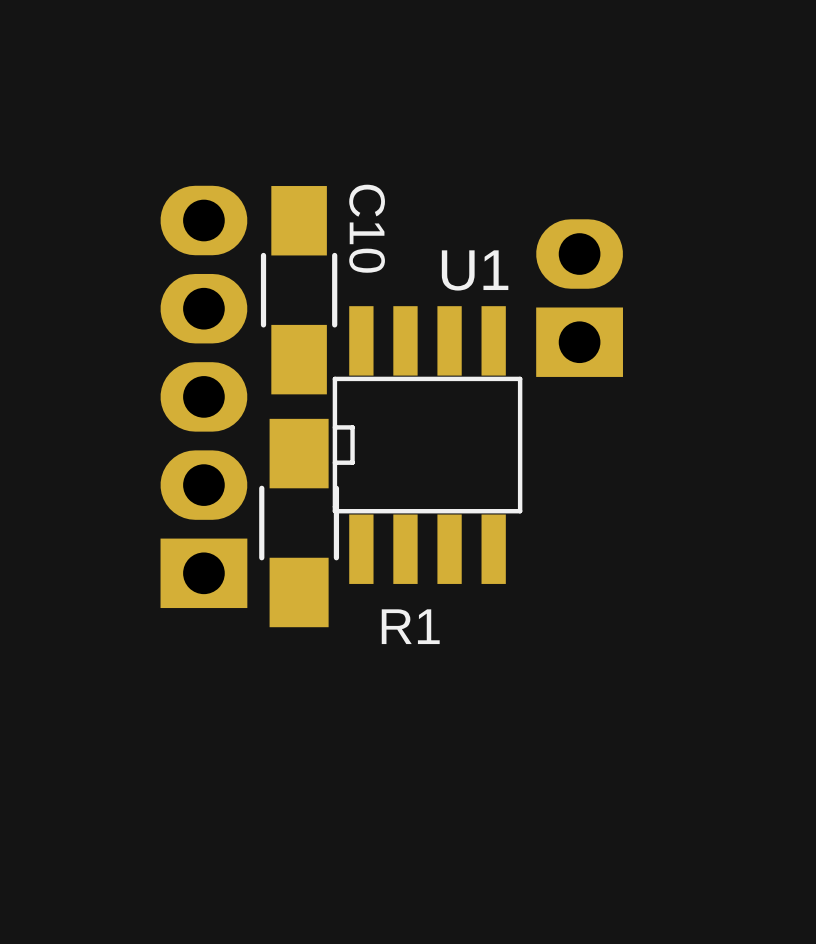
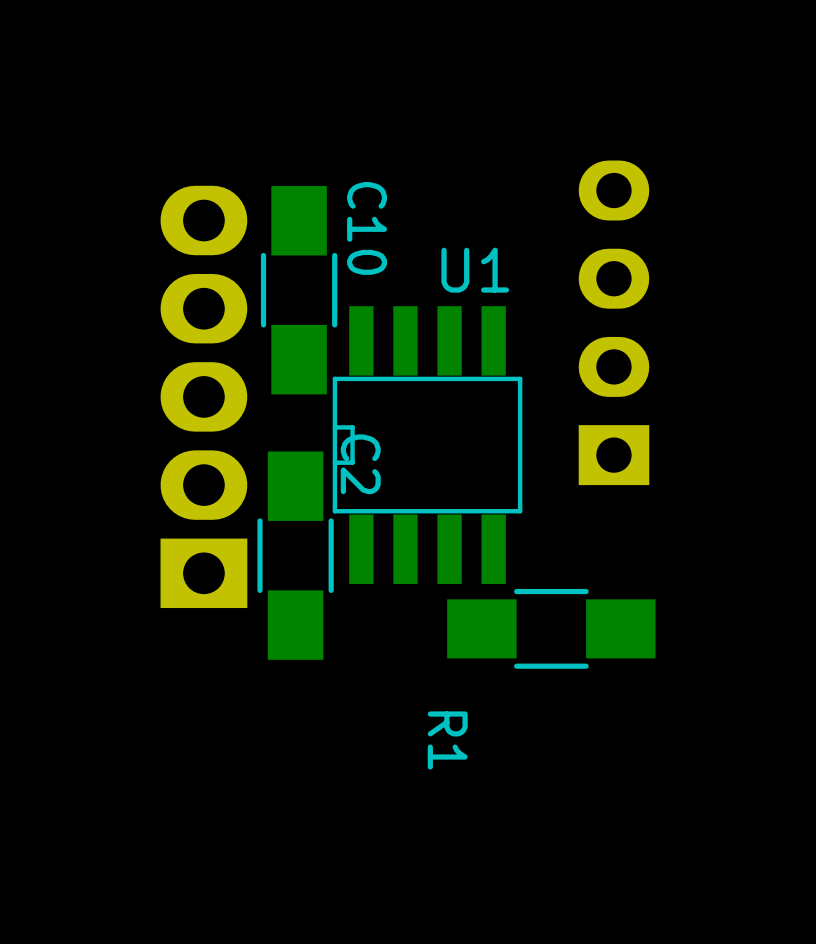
part: (579, 298) -> none
part: none -> (613, 322)
R1 rotation: 0° (299, 523) -> 90° clockwise (551, 628)
R1 position: (299, 523) -> (551, 628)
C2: none -> (295, 555)

